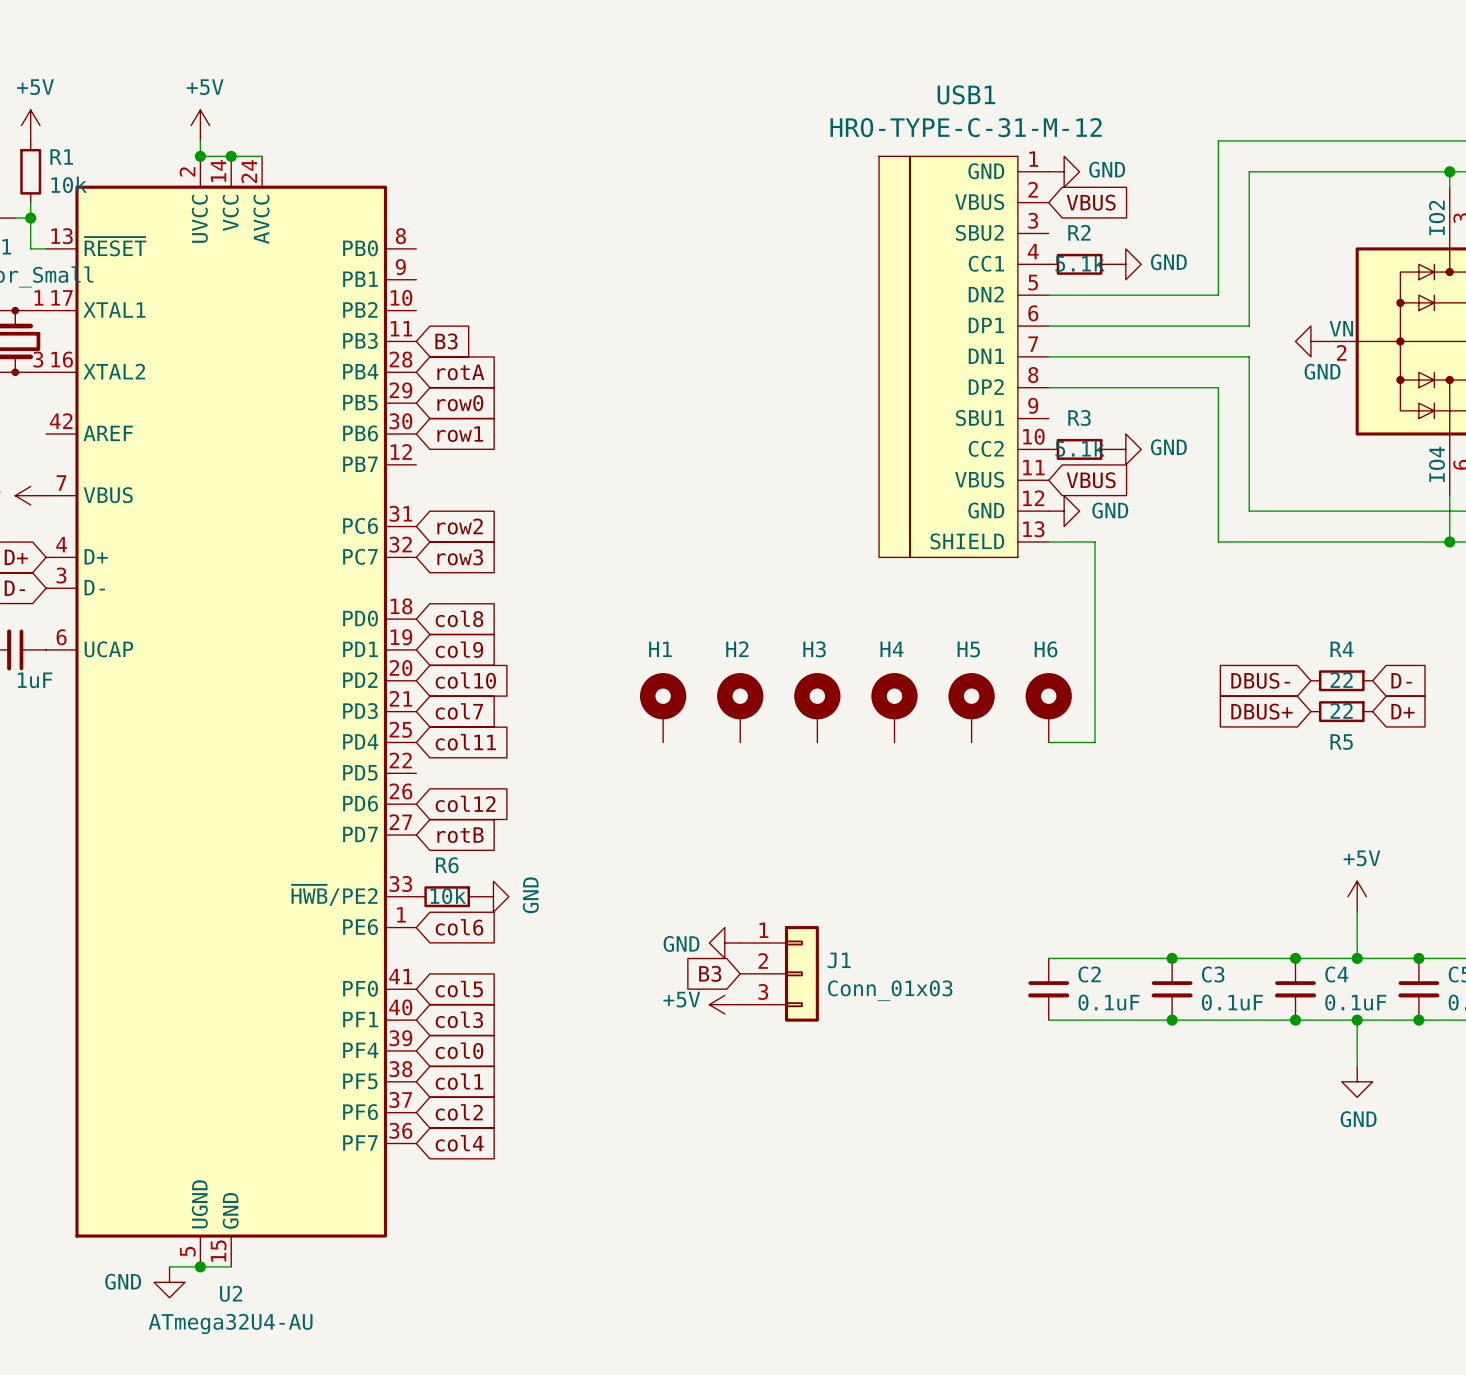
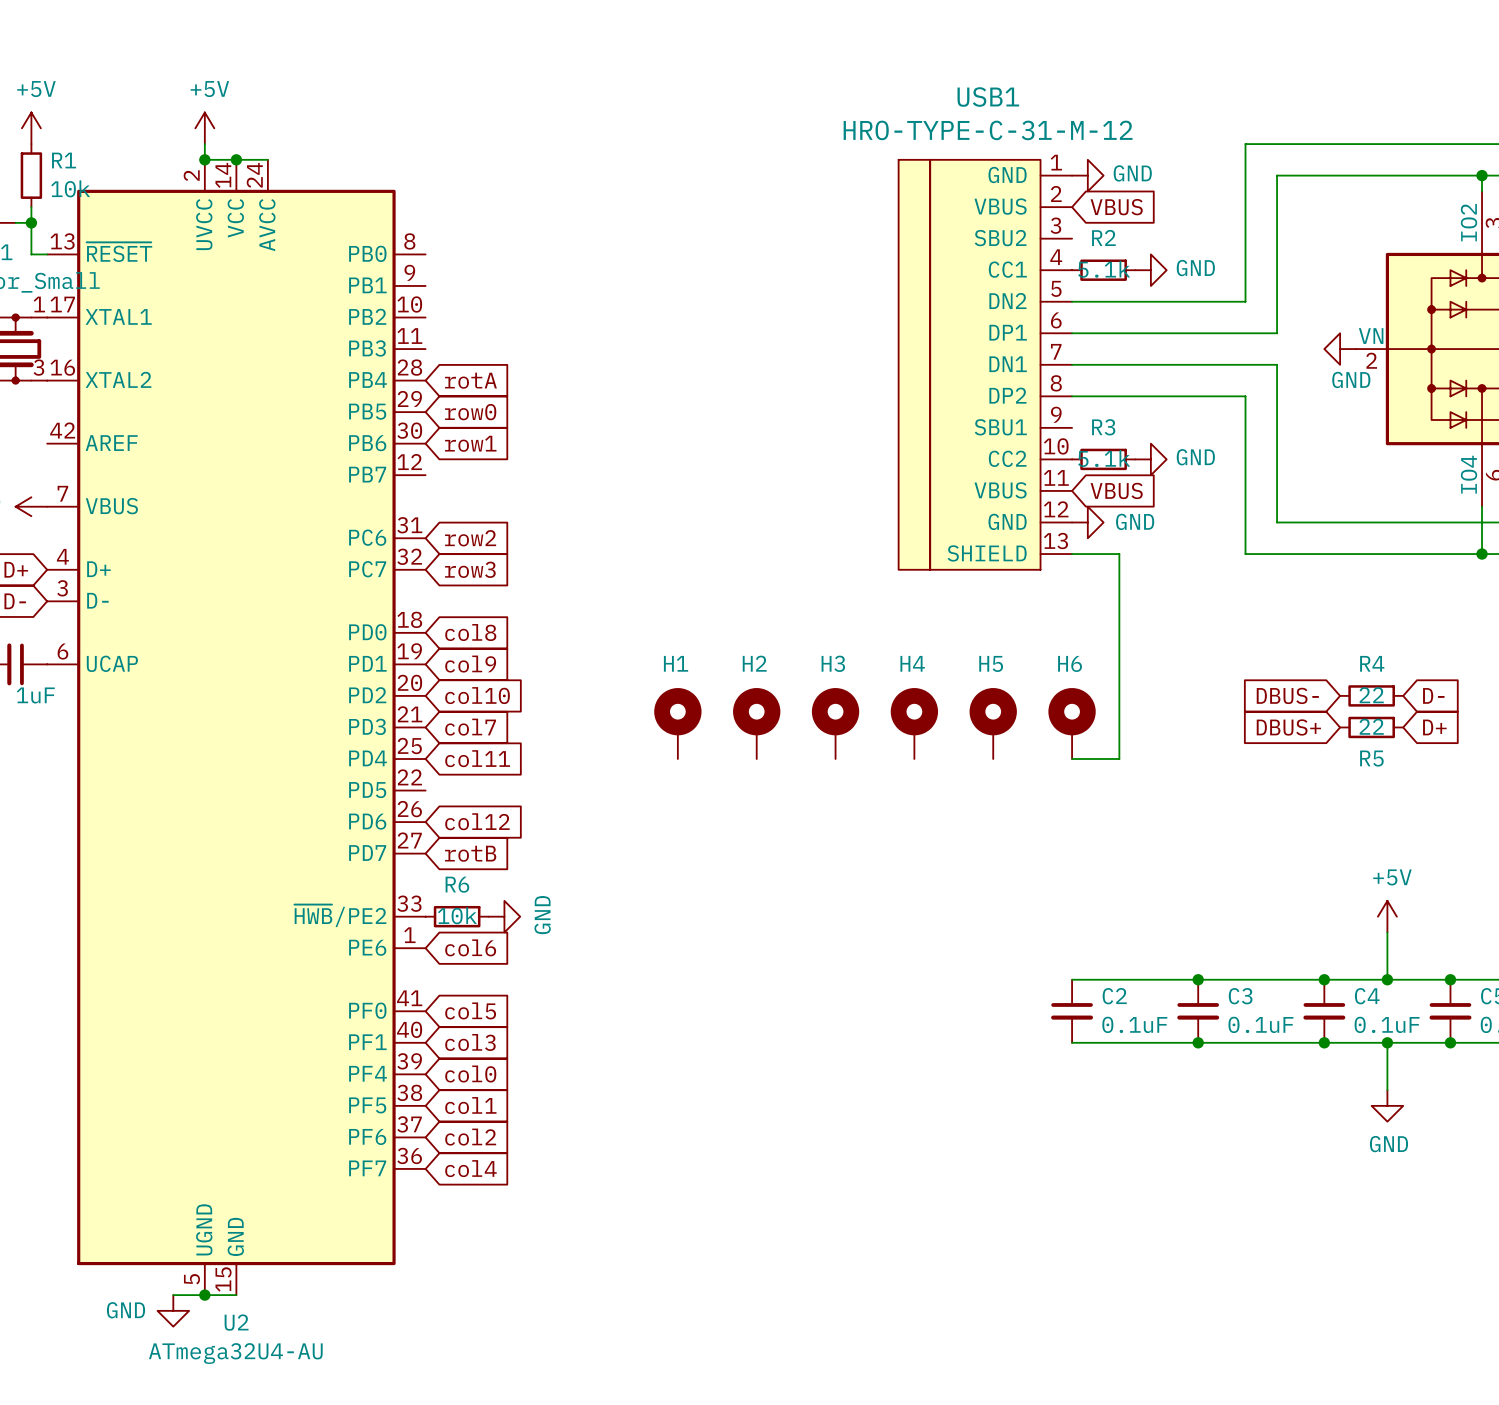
global label: B3 (446, 341) -> none
power symbol: GND (724, 942) -> none
global label: B3 (710, 973) -> none
J1: Conn_01x03 (779, 973) -> none
power symbol: +5V (724, 1004) -> none

